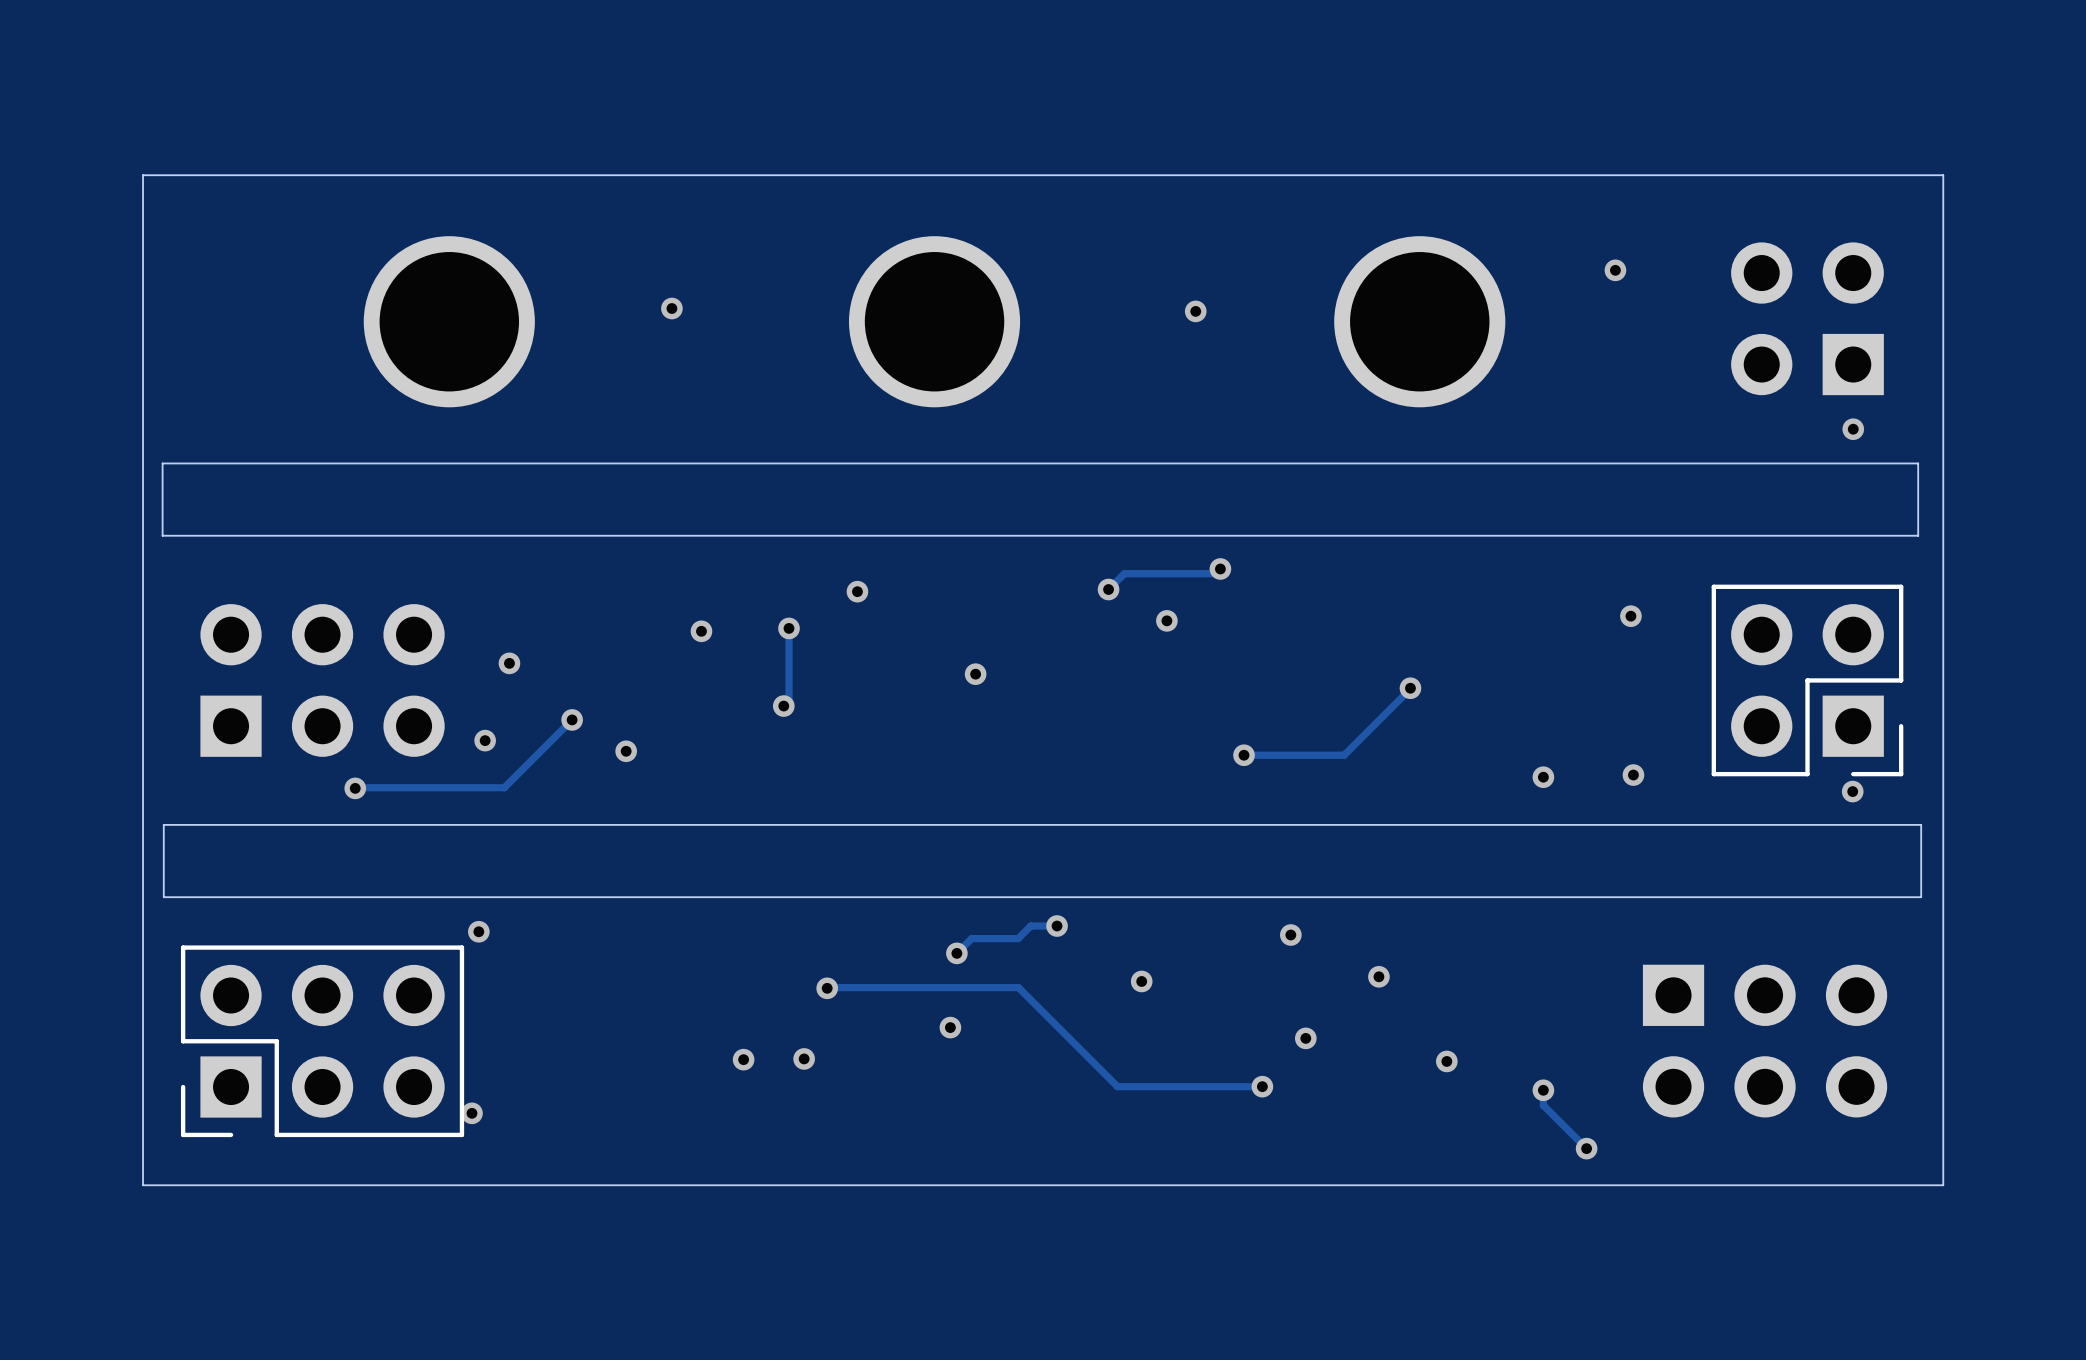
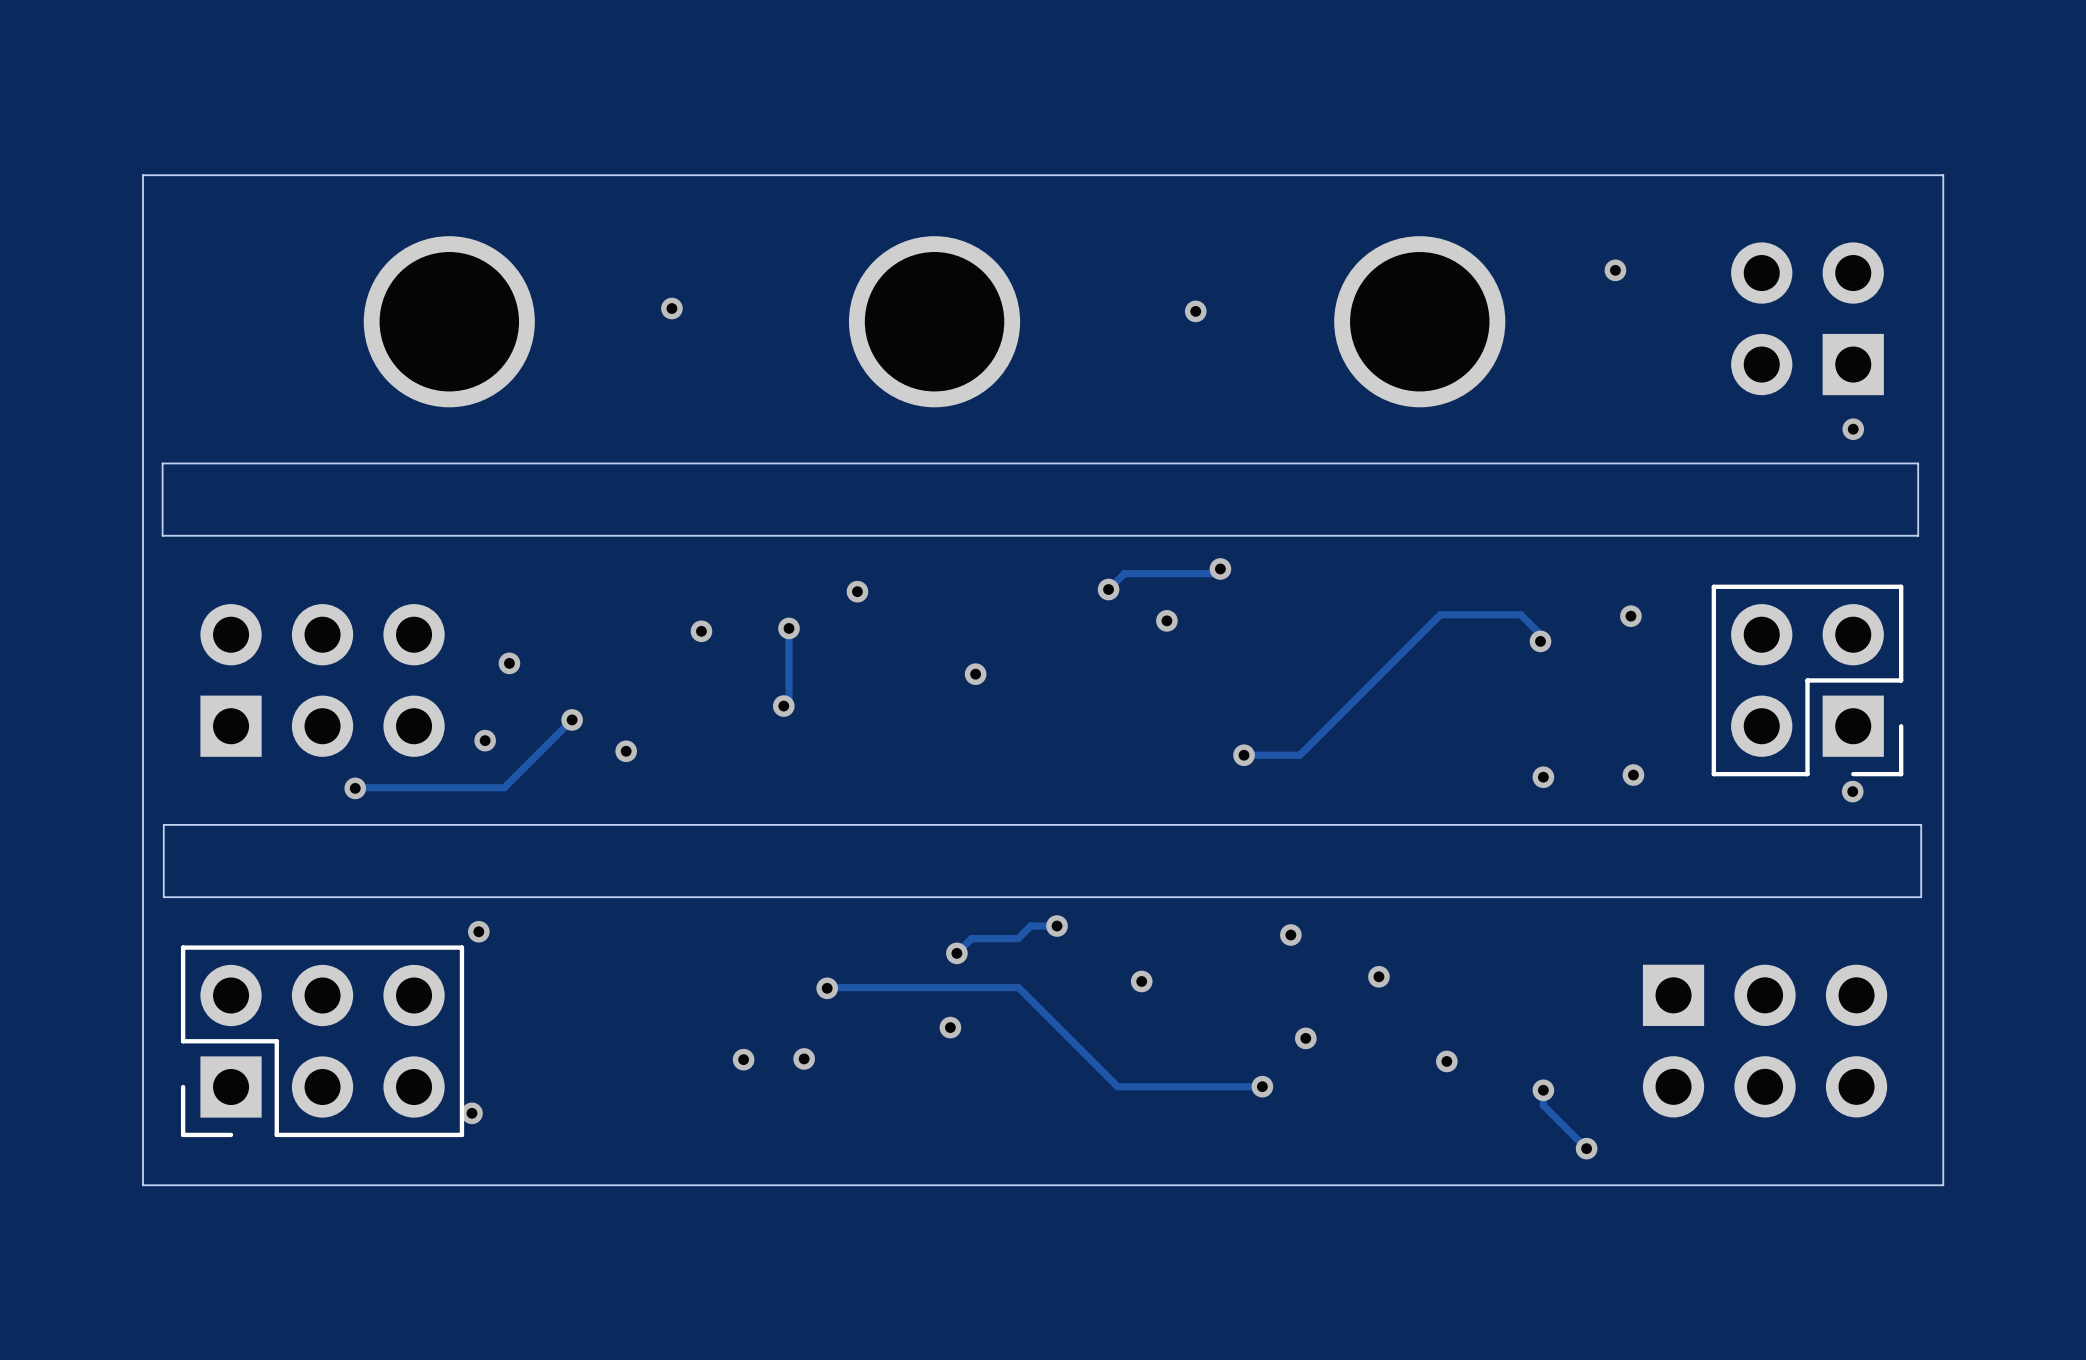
track: (1410, 688) (1344, 755) (1299, 755) -> (1540, 641) (1540, 634) (1520, 614) (1440, 614) (1299, 755)
via position: (1410, 688) -> (1540, 641)

